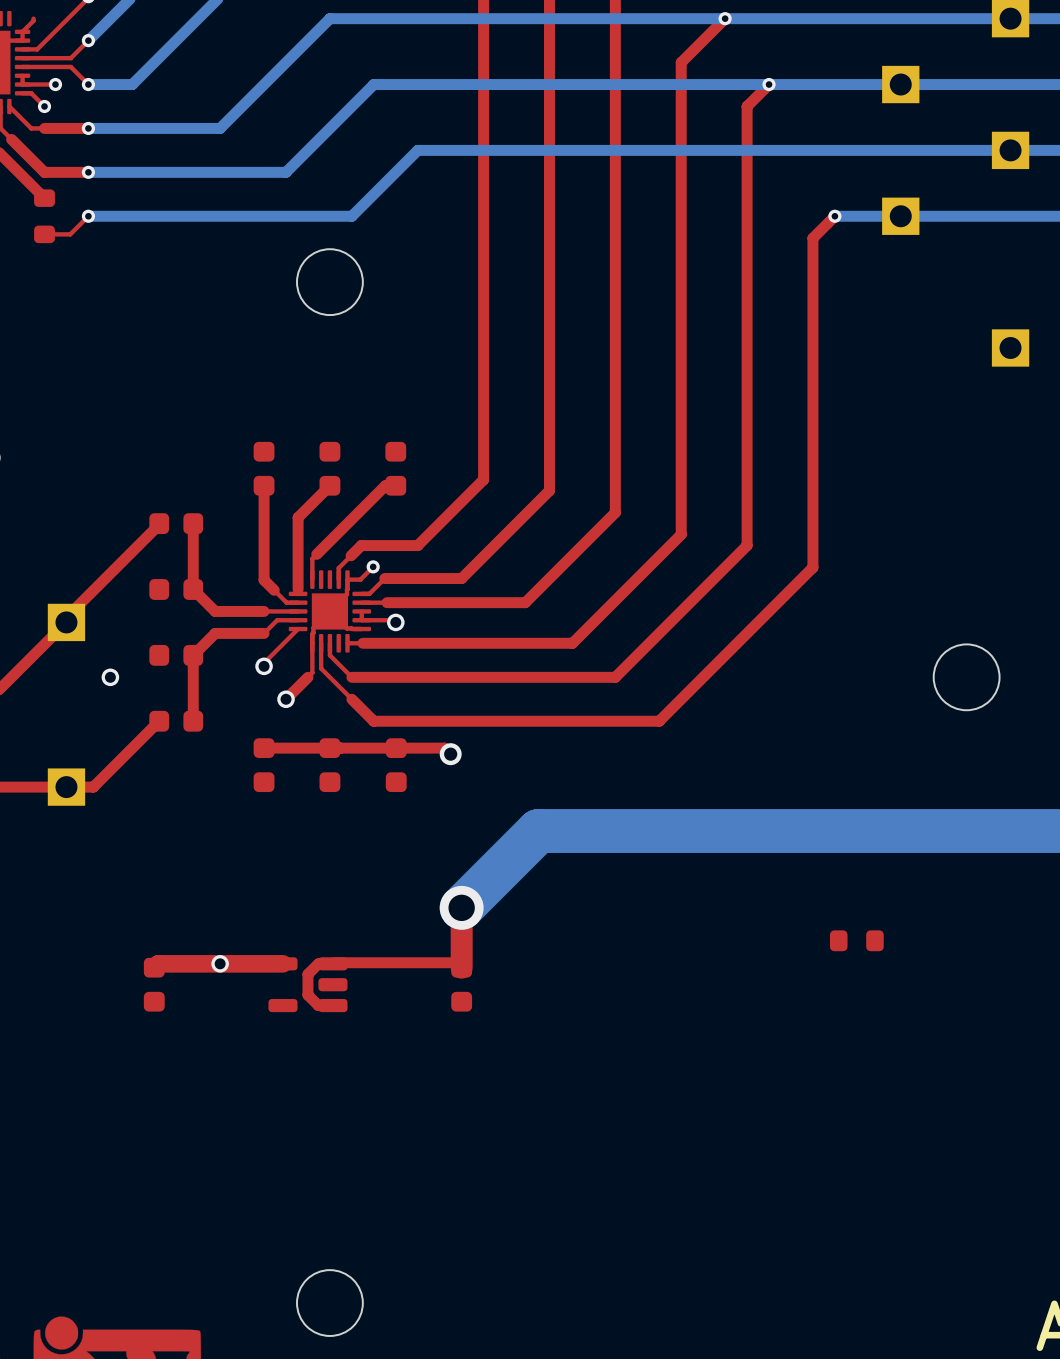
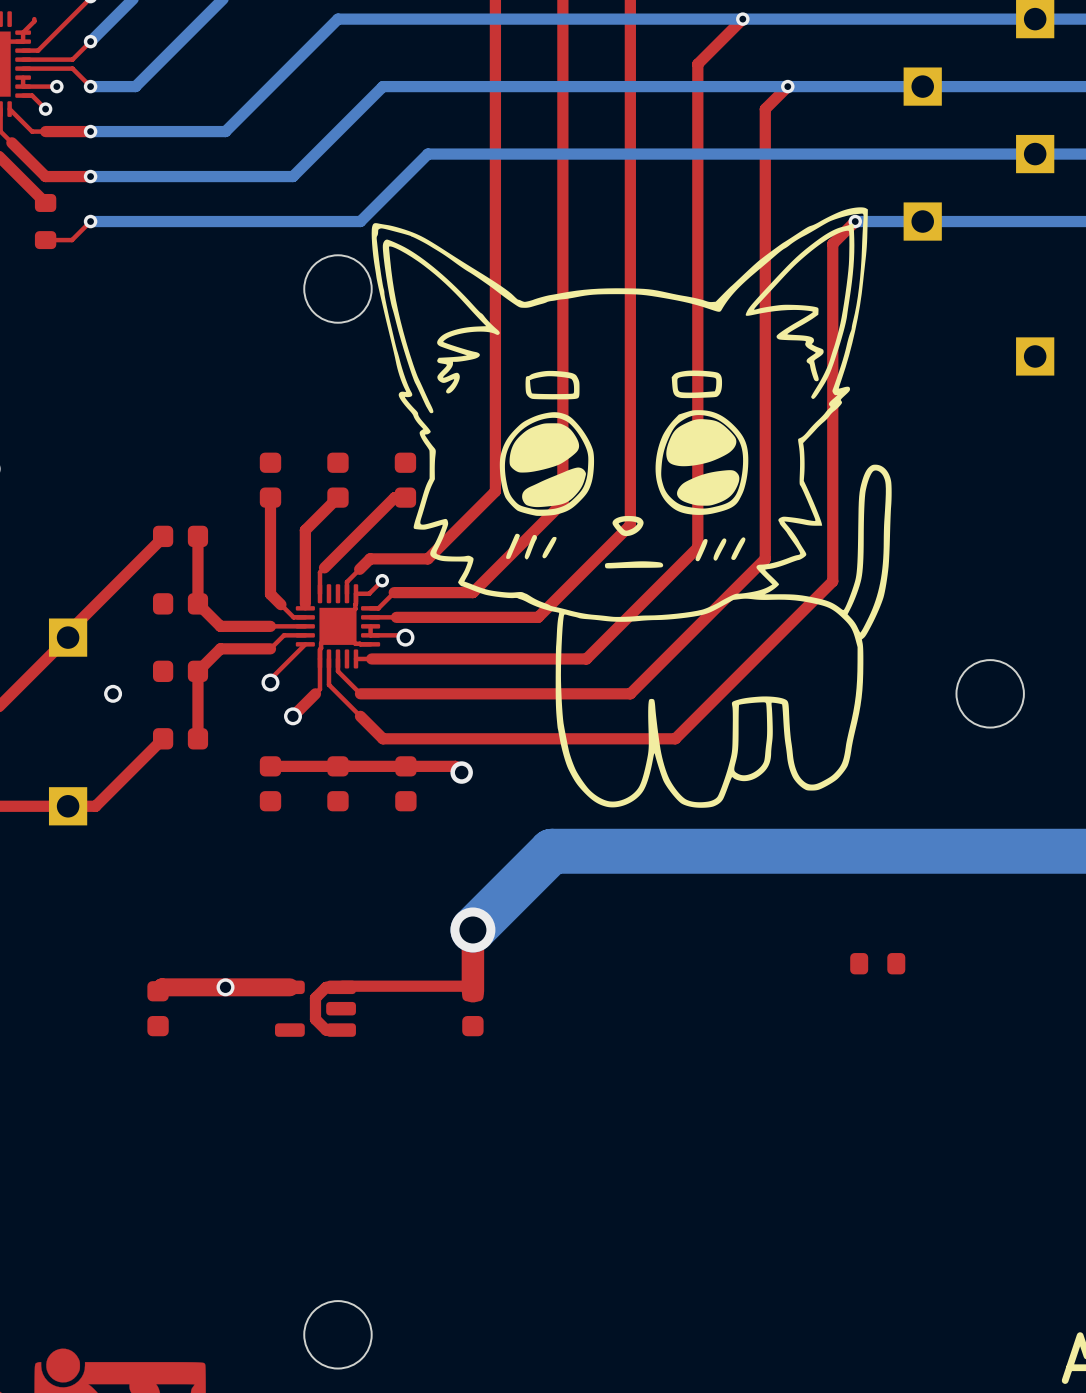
drawing: none -> [371, 207, 892, 808]

